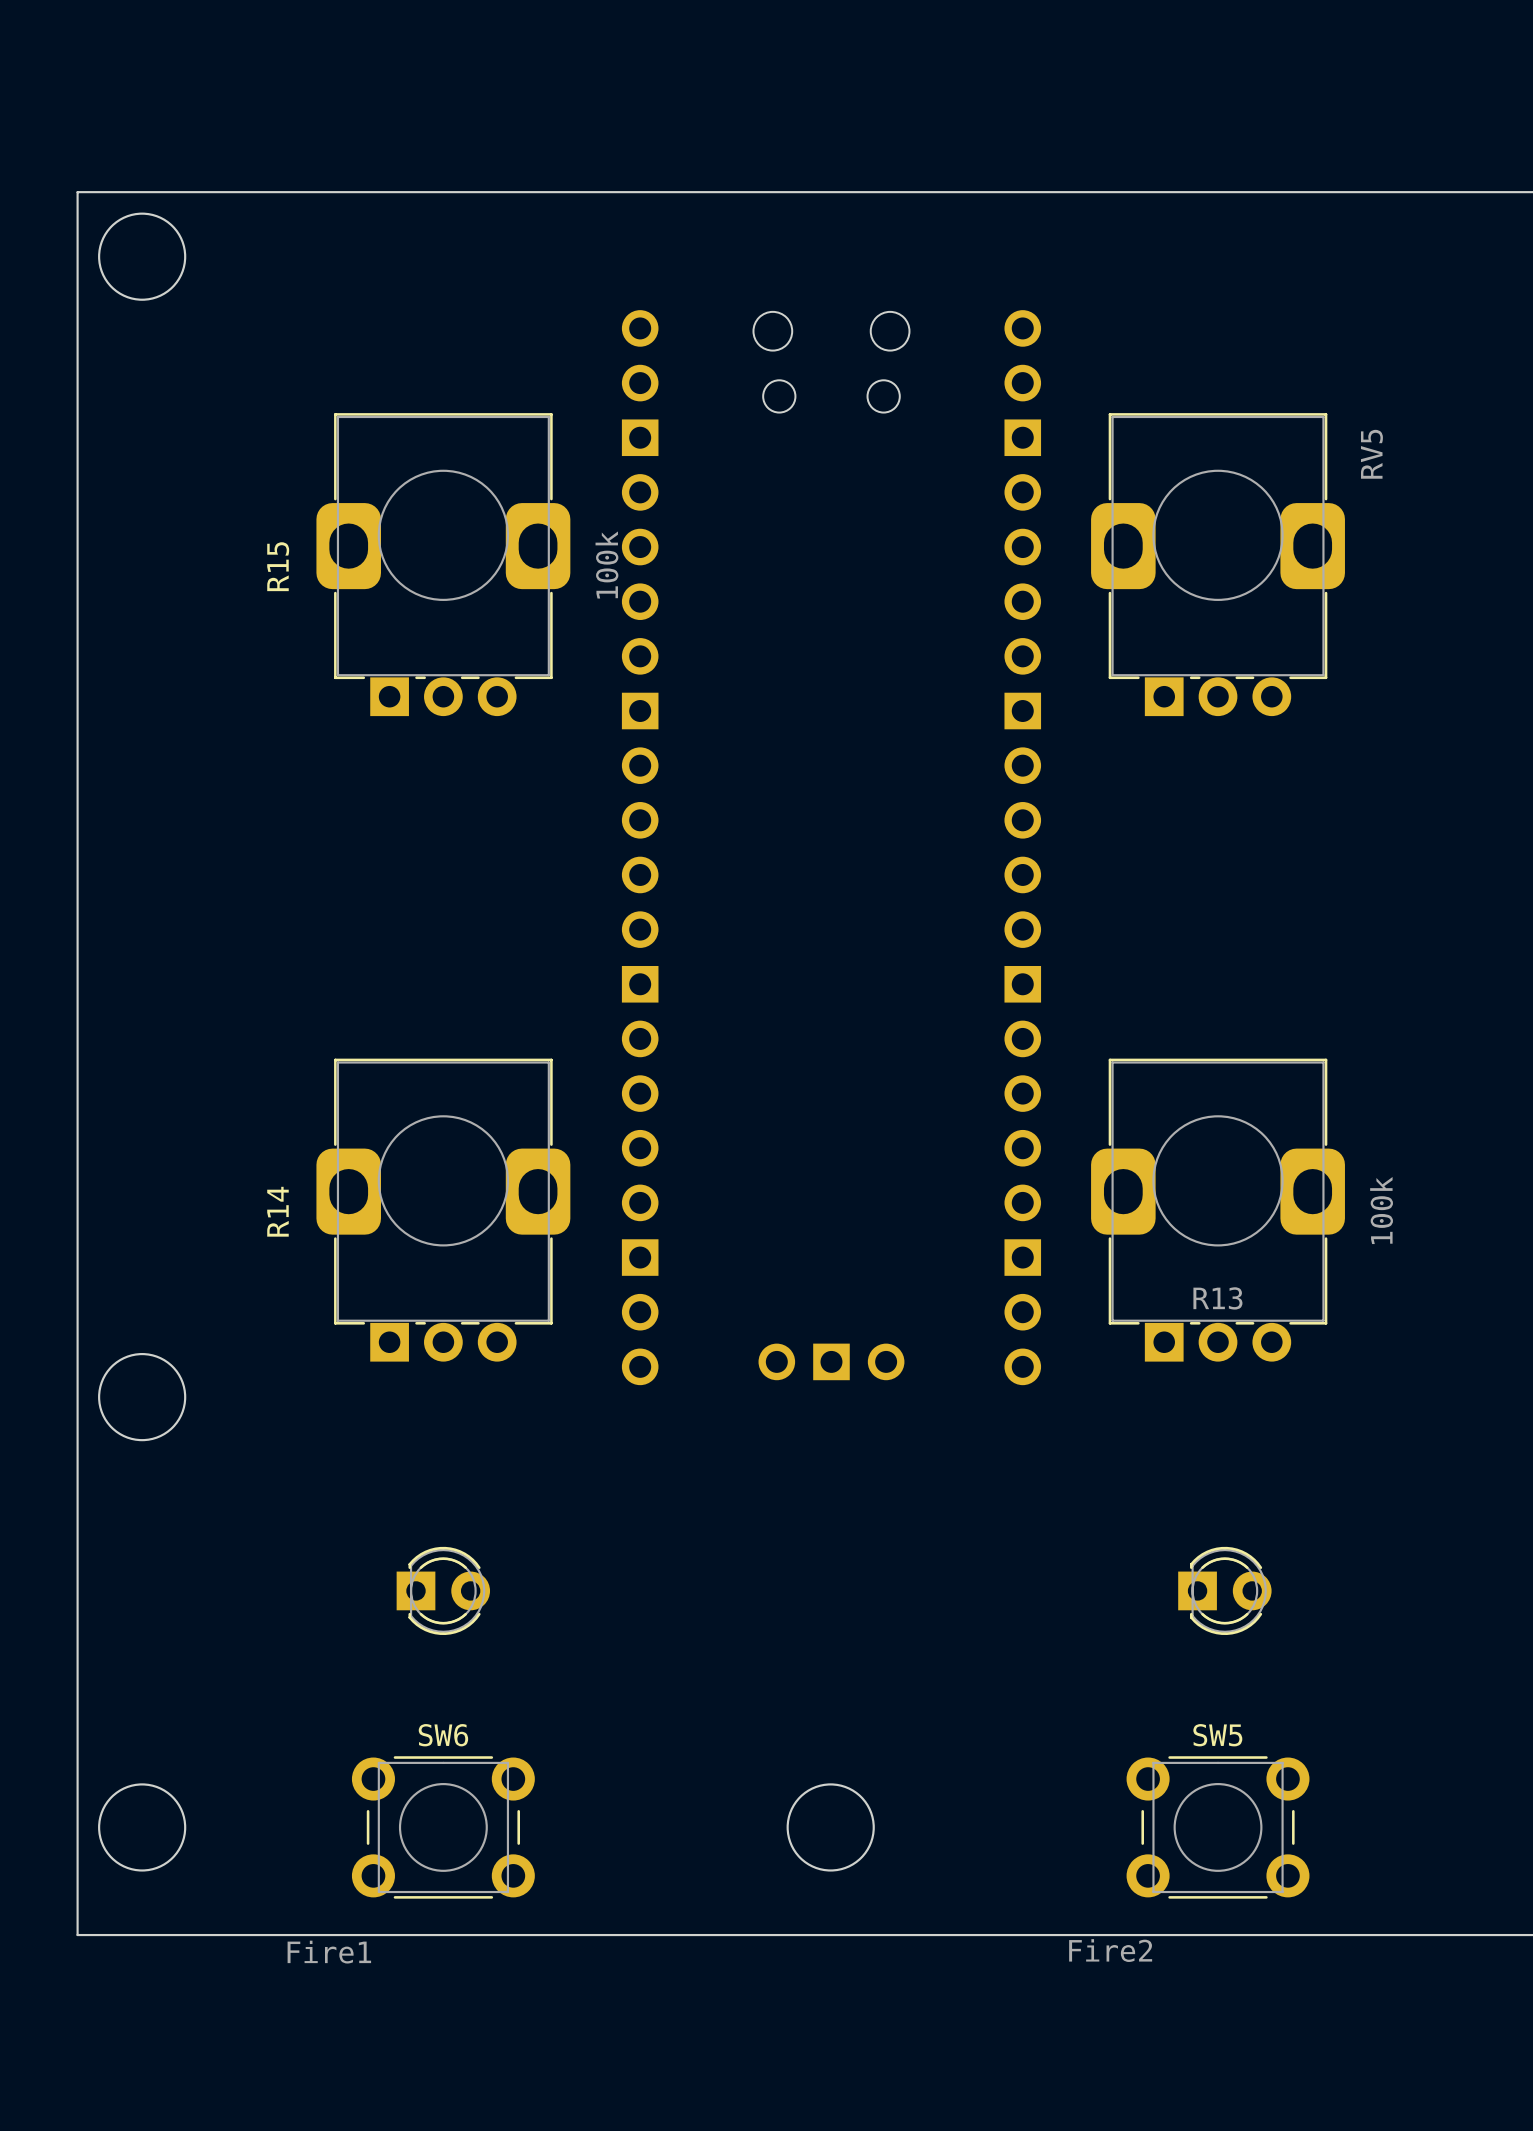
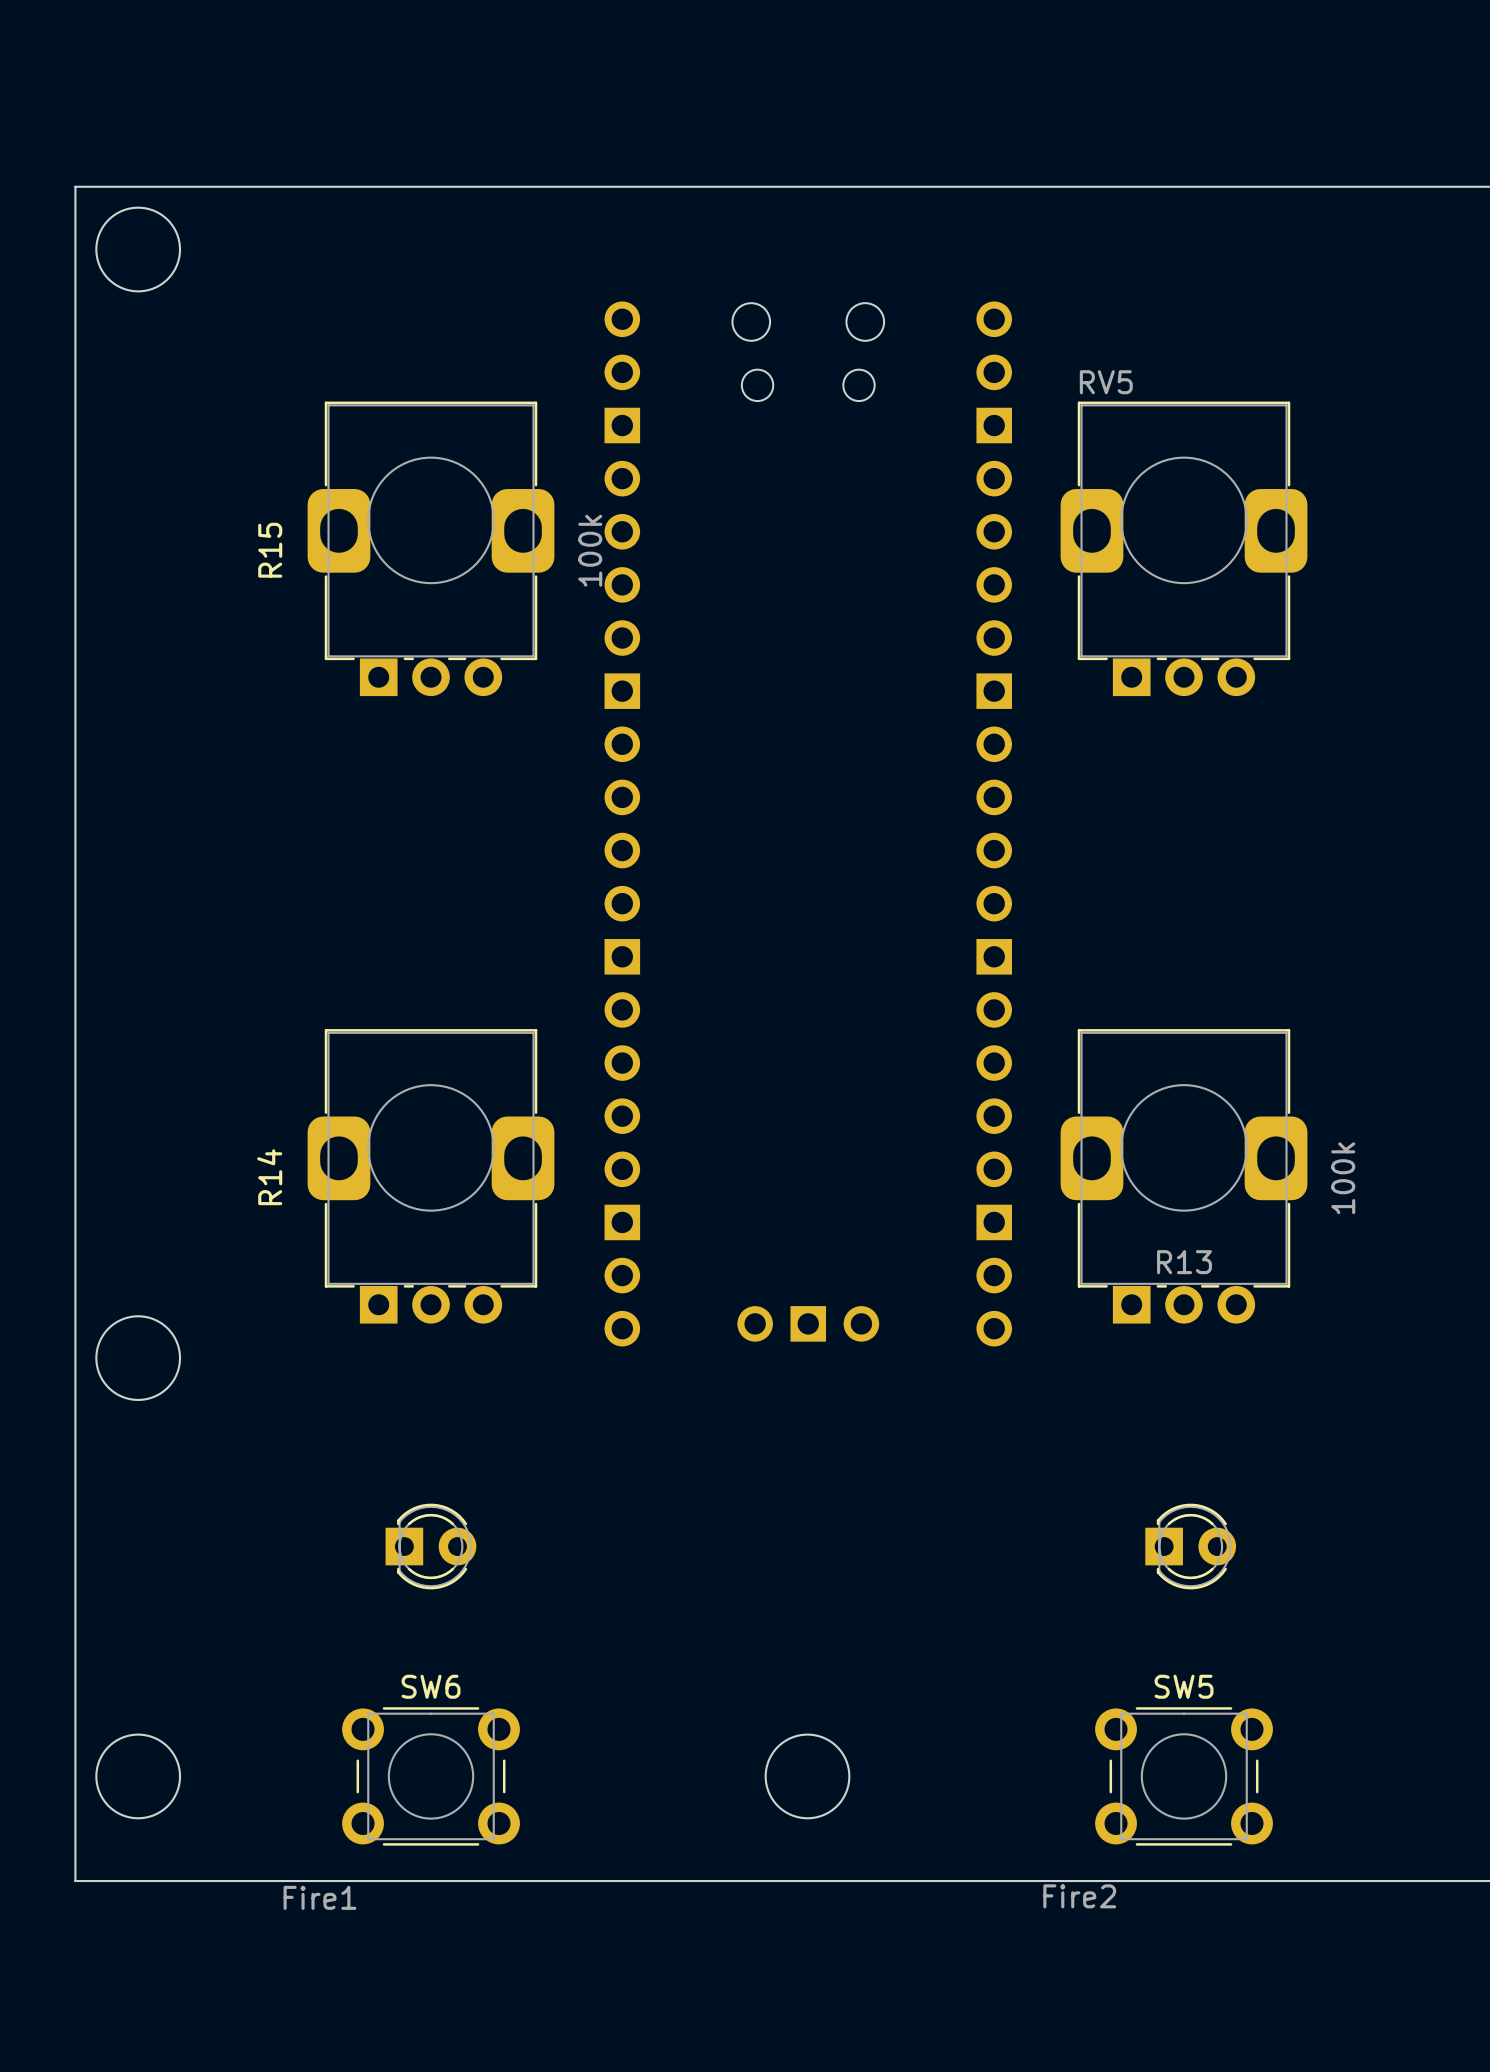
RV5 name rotation: 0° (1371, 454) -> 90° clockwise (1106, 382)
RV5 name position: RV5 (1371, 454) -> RV5 (1106, 382)

